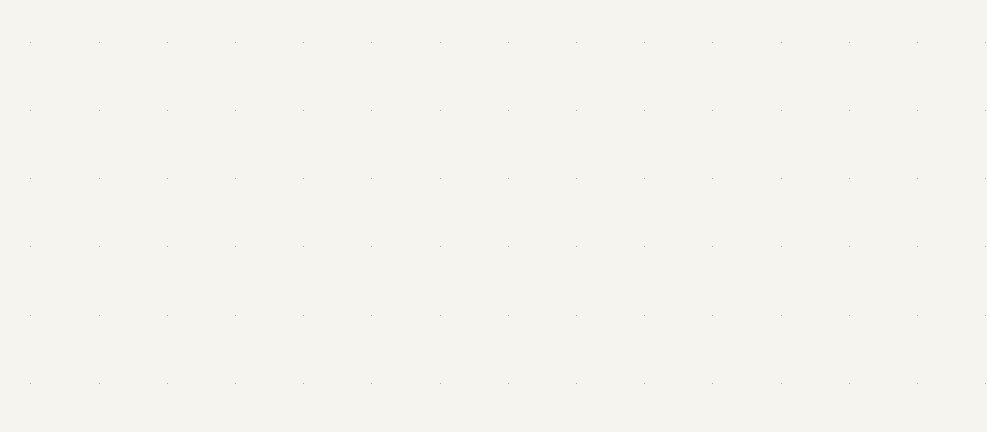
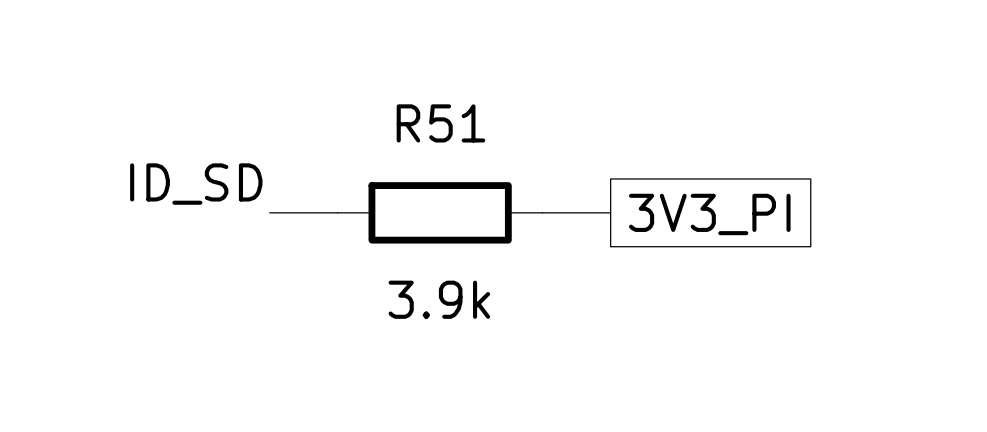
label: none -> ID_SD (196, 184)
wire: none -> (269, 212) (337, 212)
R51: none -> 3.9k (440, 212)
wire: none -> (542, 212) (610, 212)
global label: none -> 3V3_PI (709, 214)

